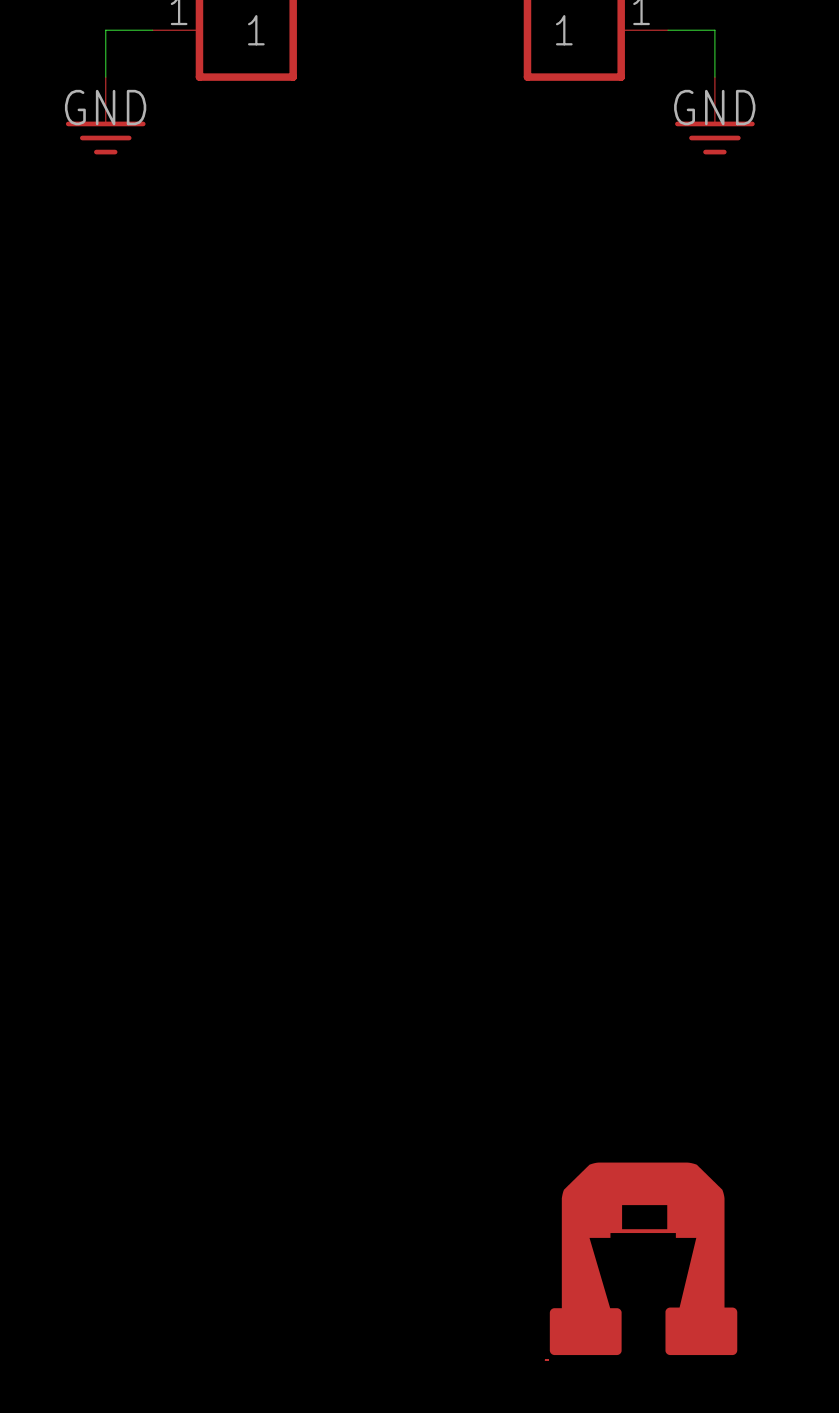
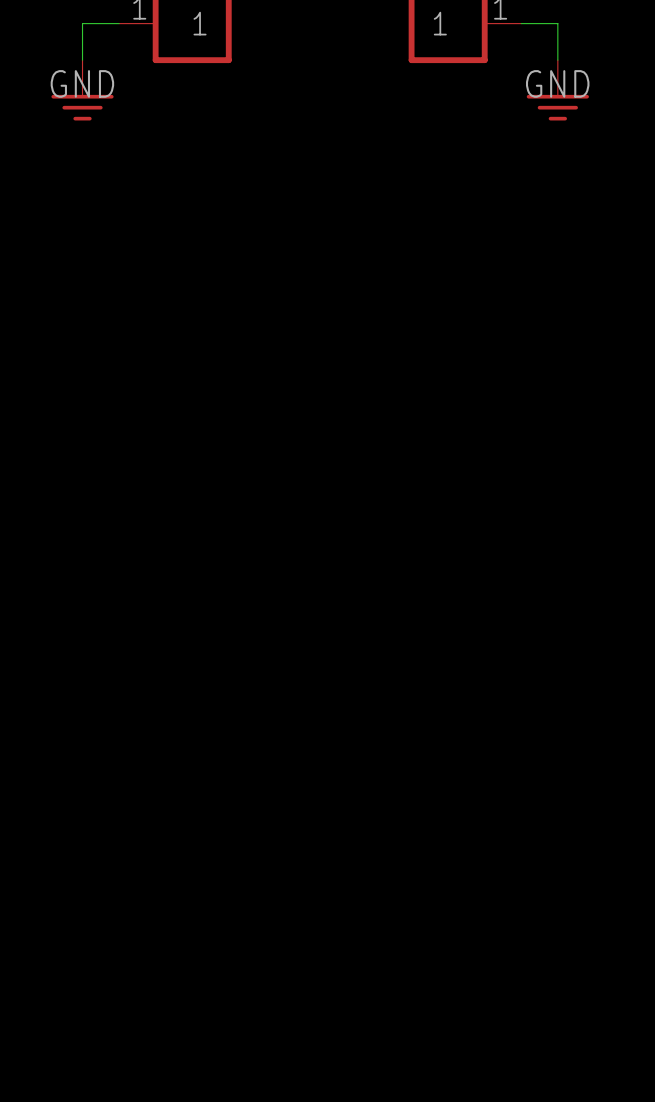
part: (643, 1258) -> none

